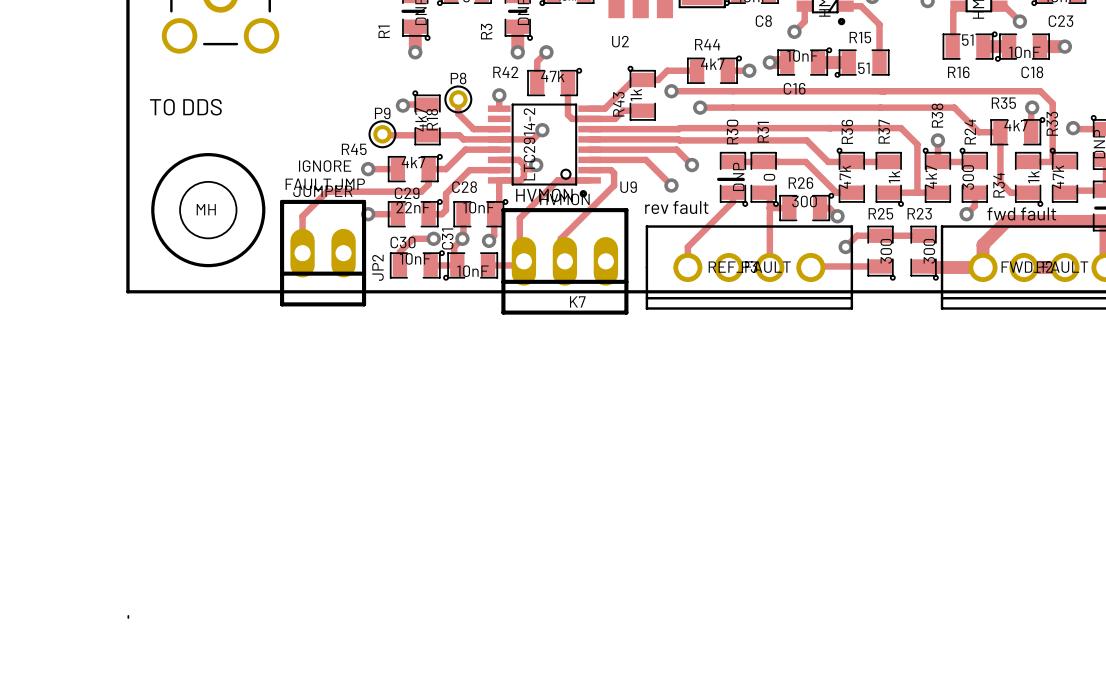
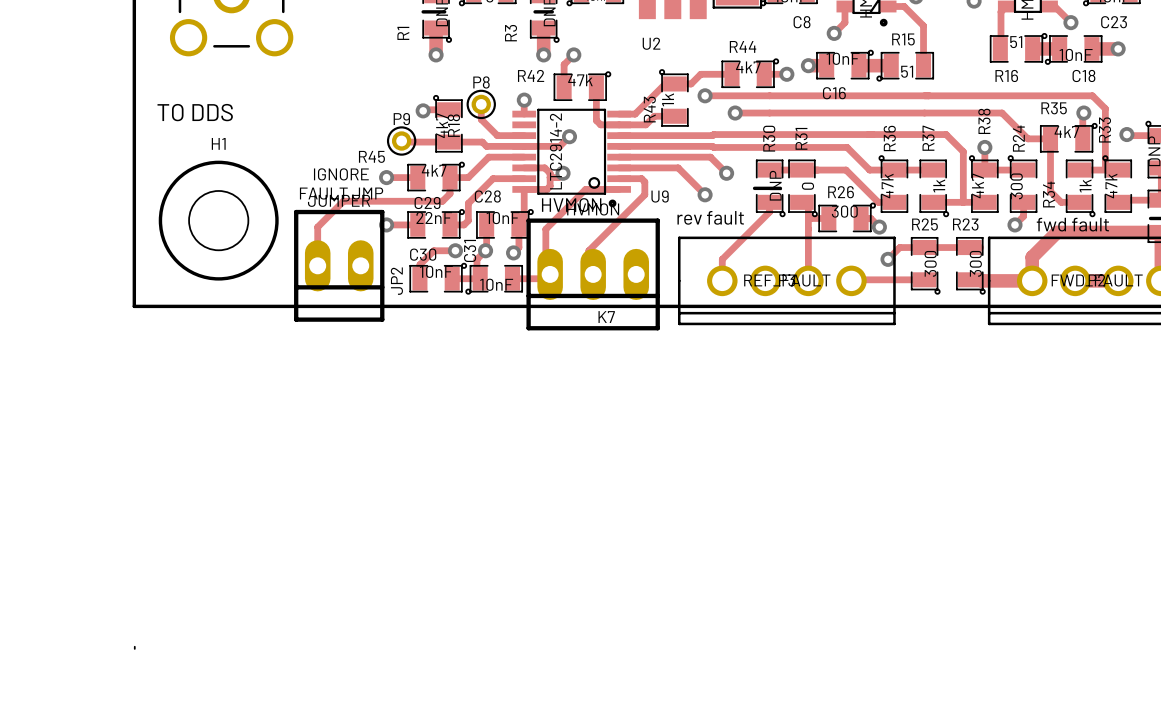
MH name: MH (206, 209) -> H1 (218, 143)

